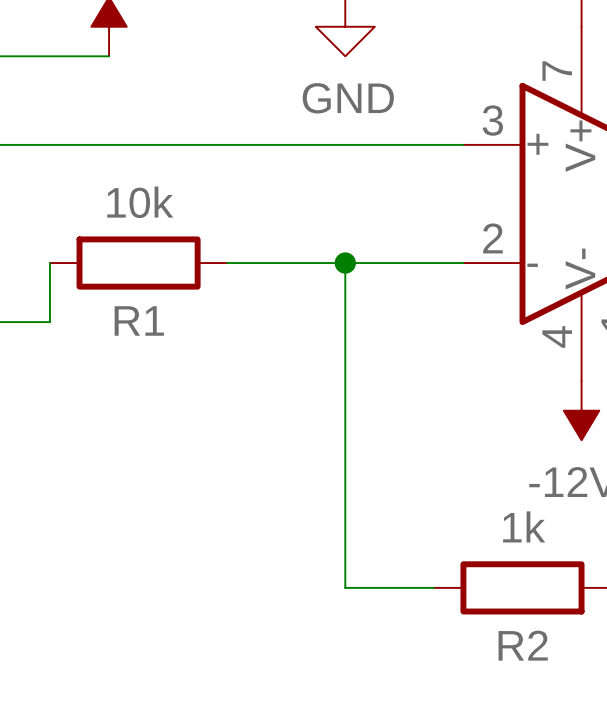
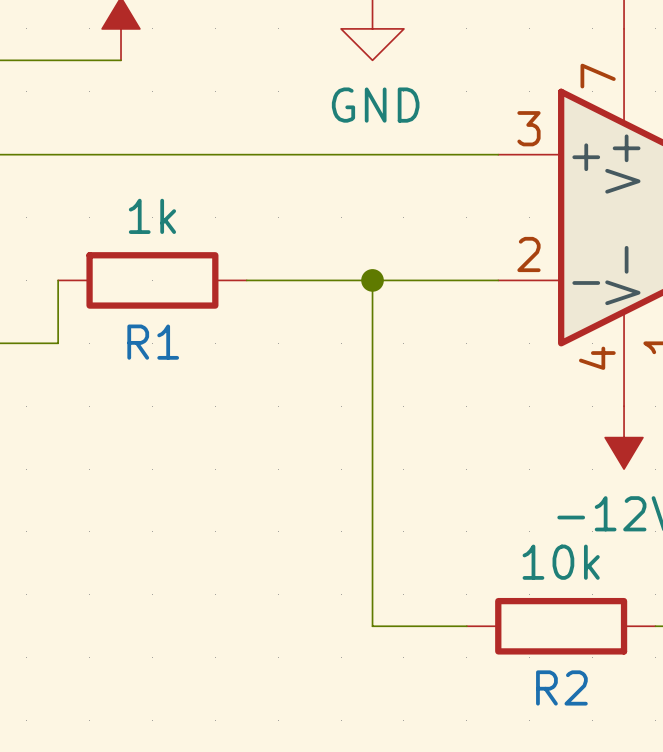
R1 value: 10k (140, 202) -> 1k (152, 216)
R2 value: 1k (524, 526) -> 10k (561, 562)

